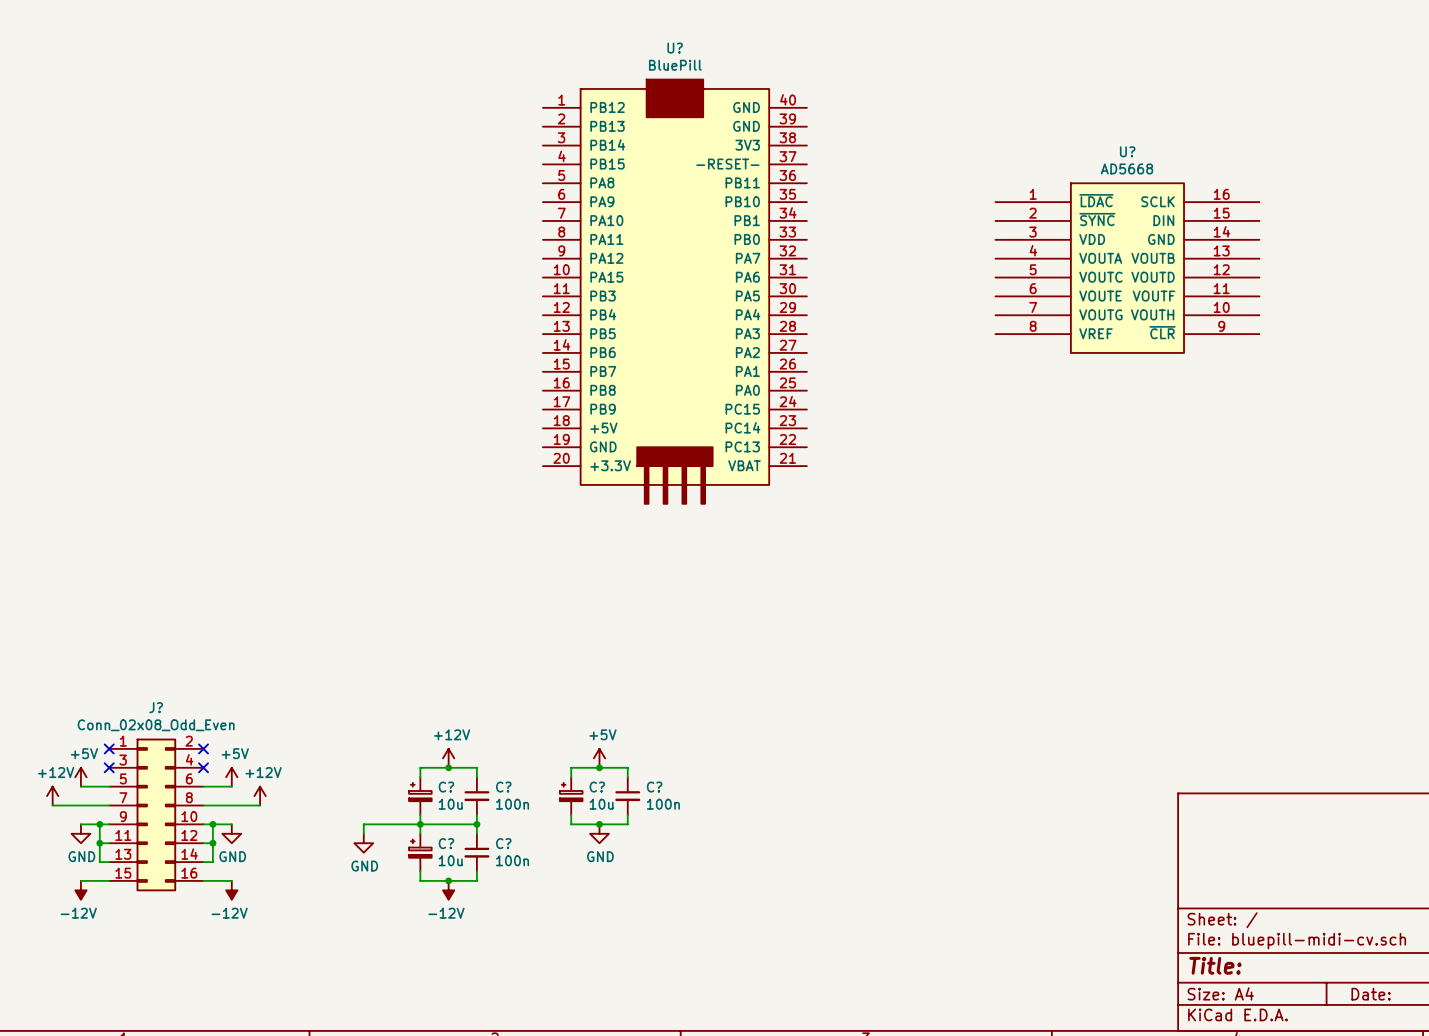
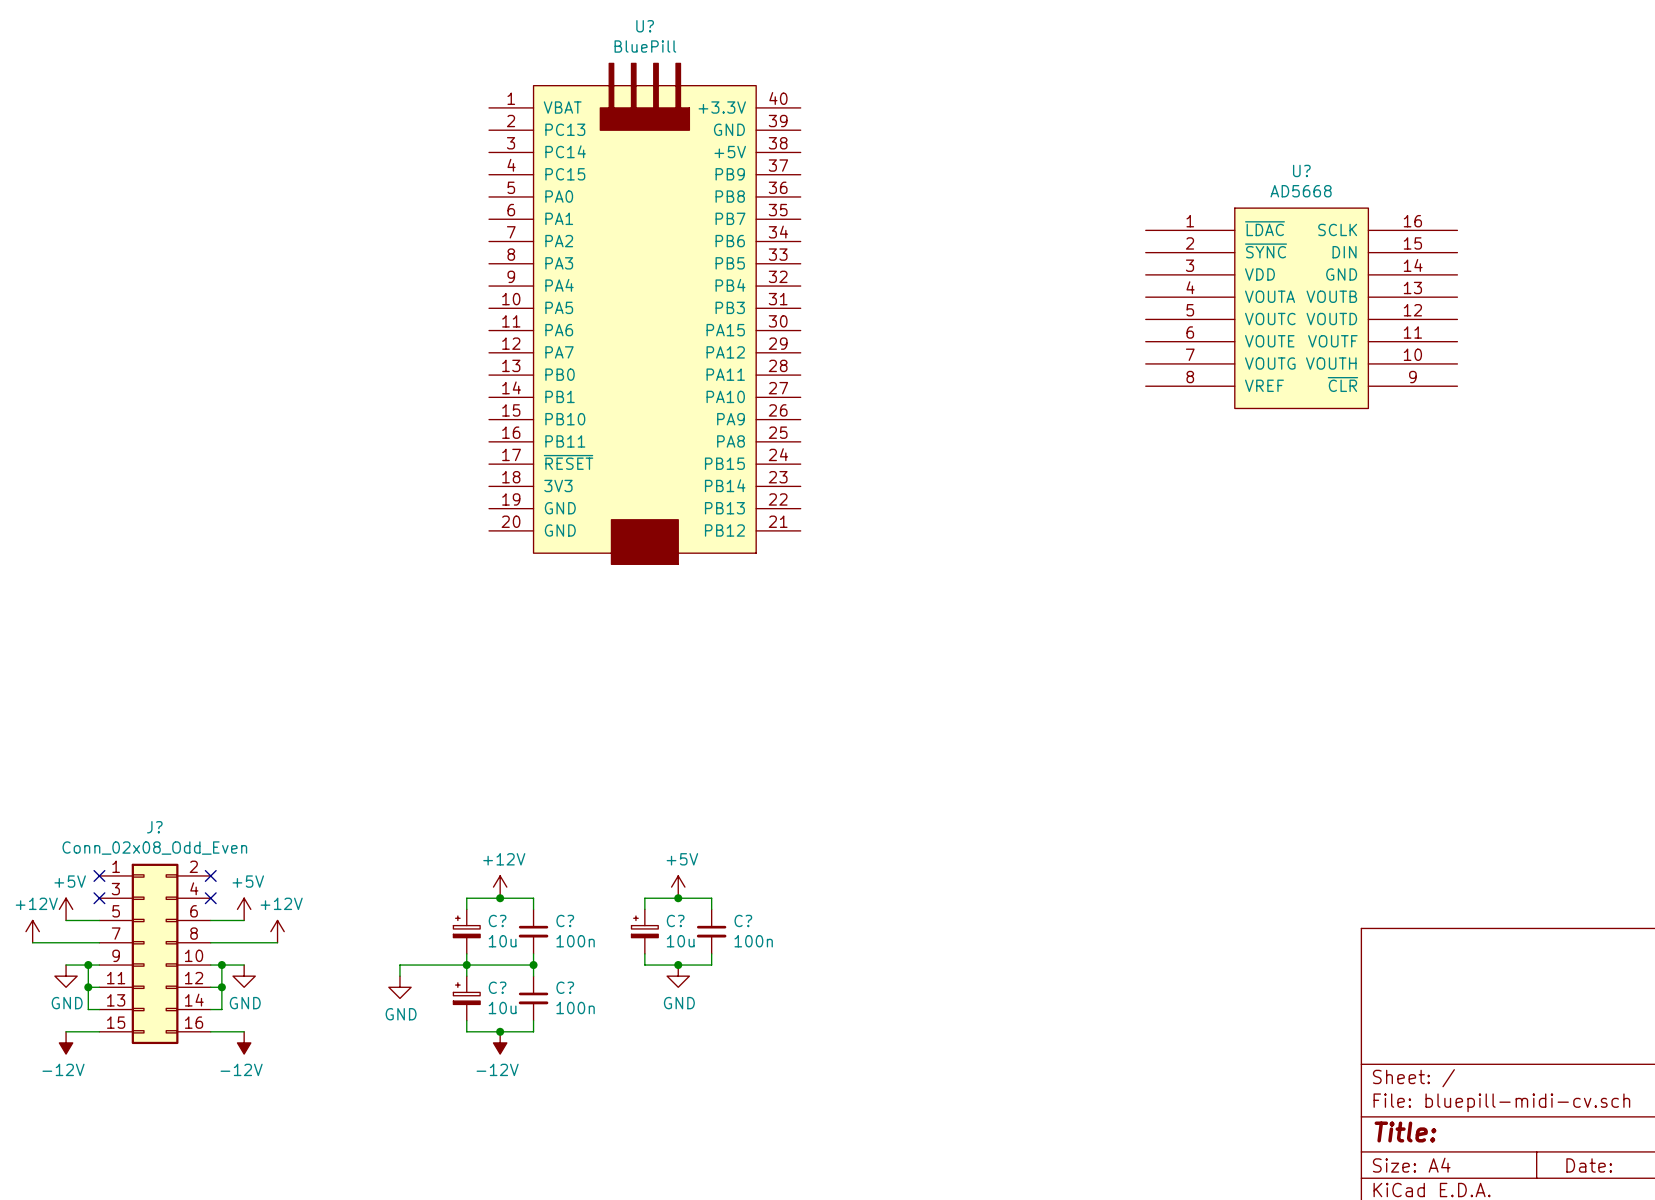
U?: none -> BluePill (644, 313)
U?: BluePill (674, 291) -> none

